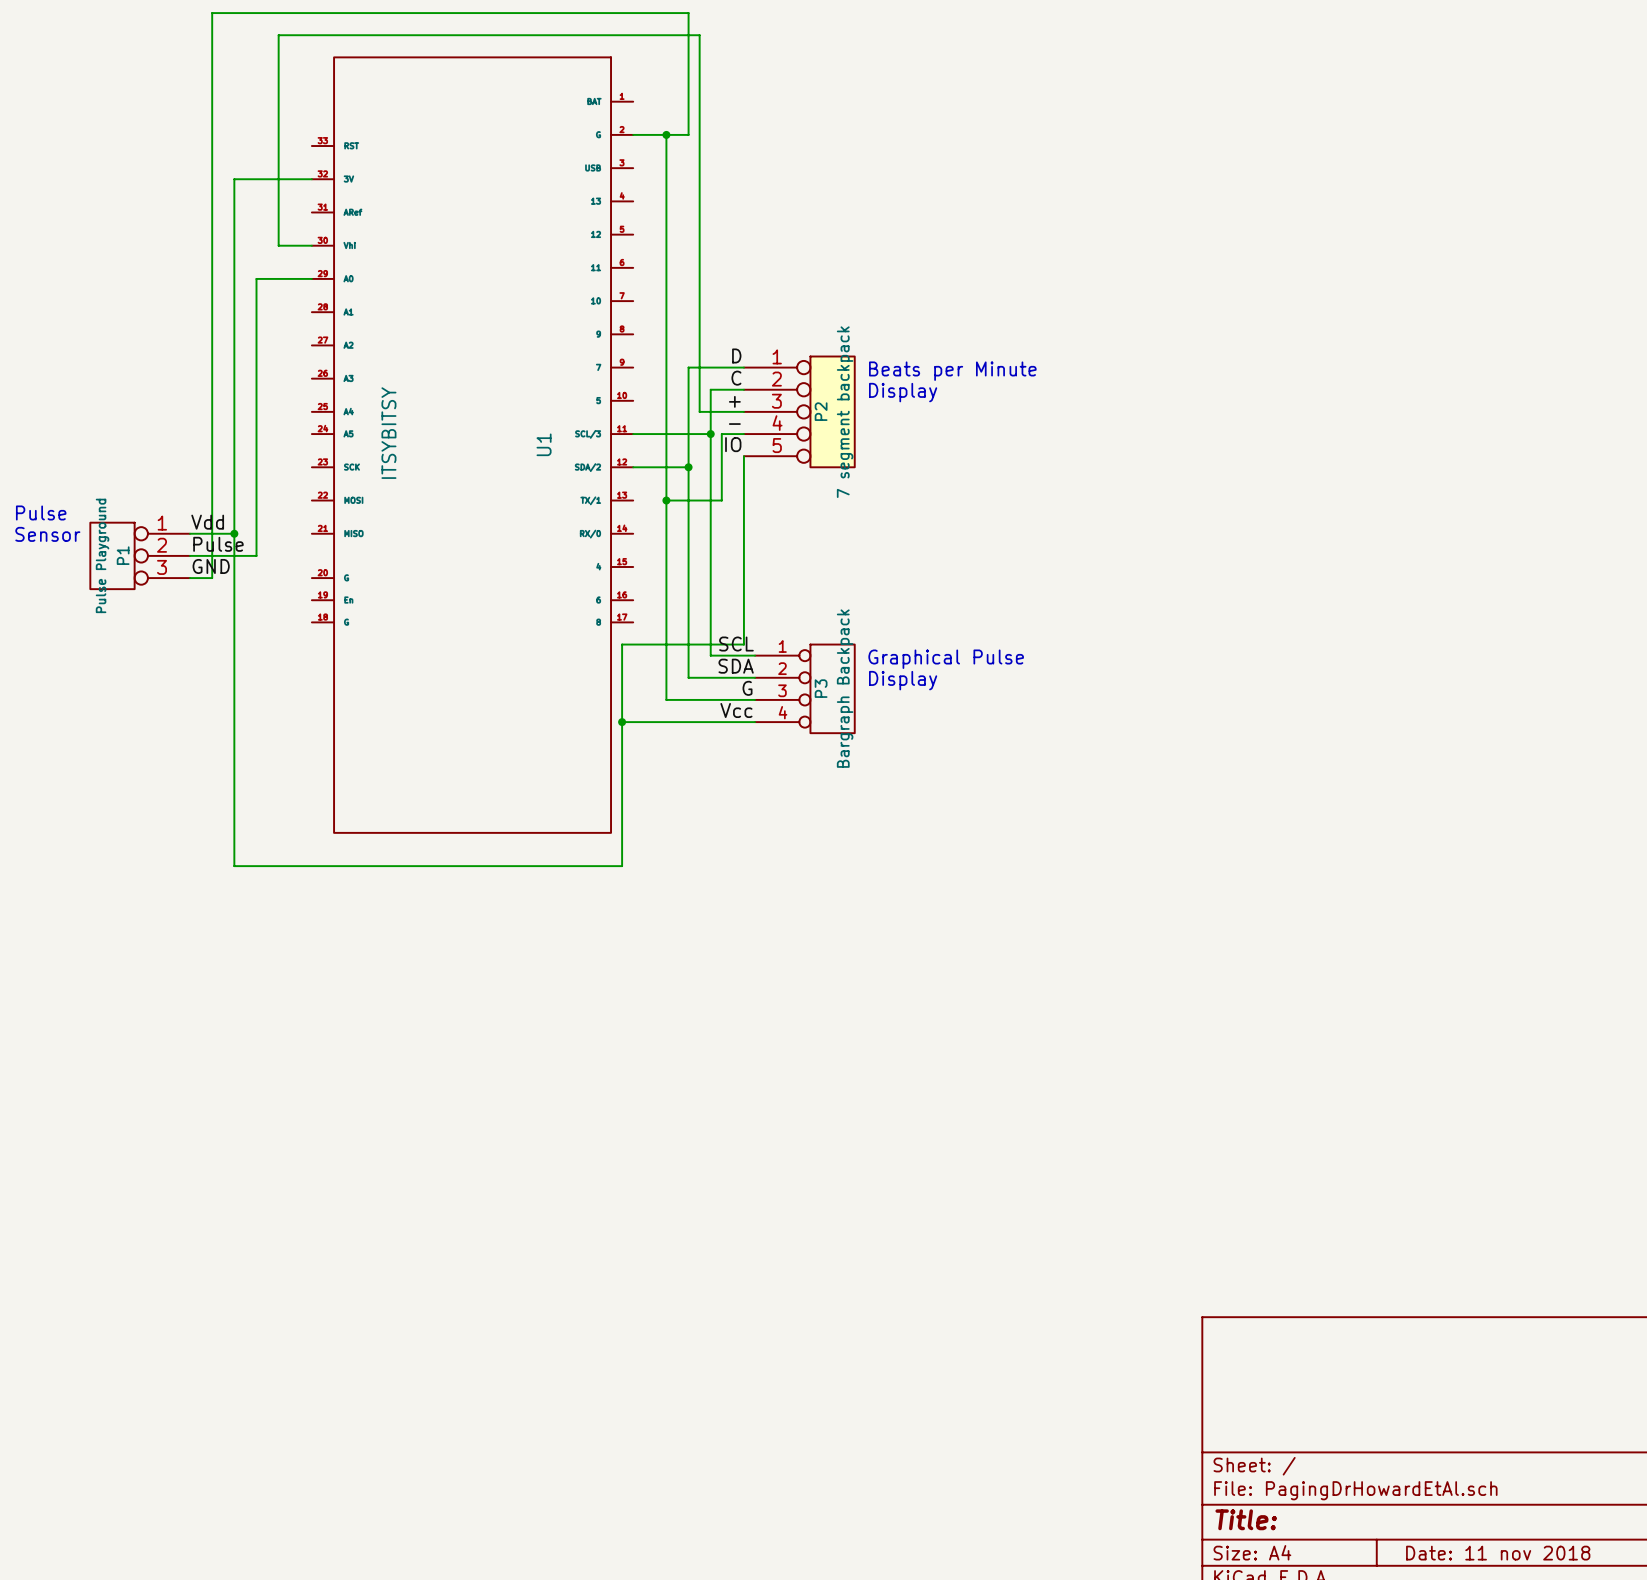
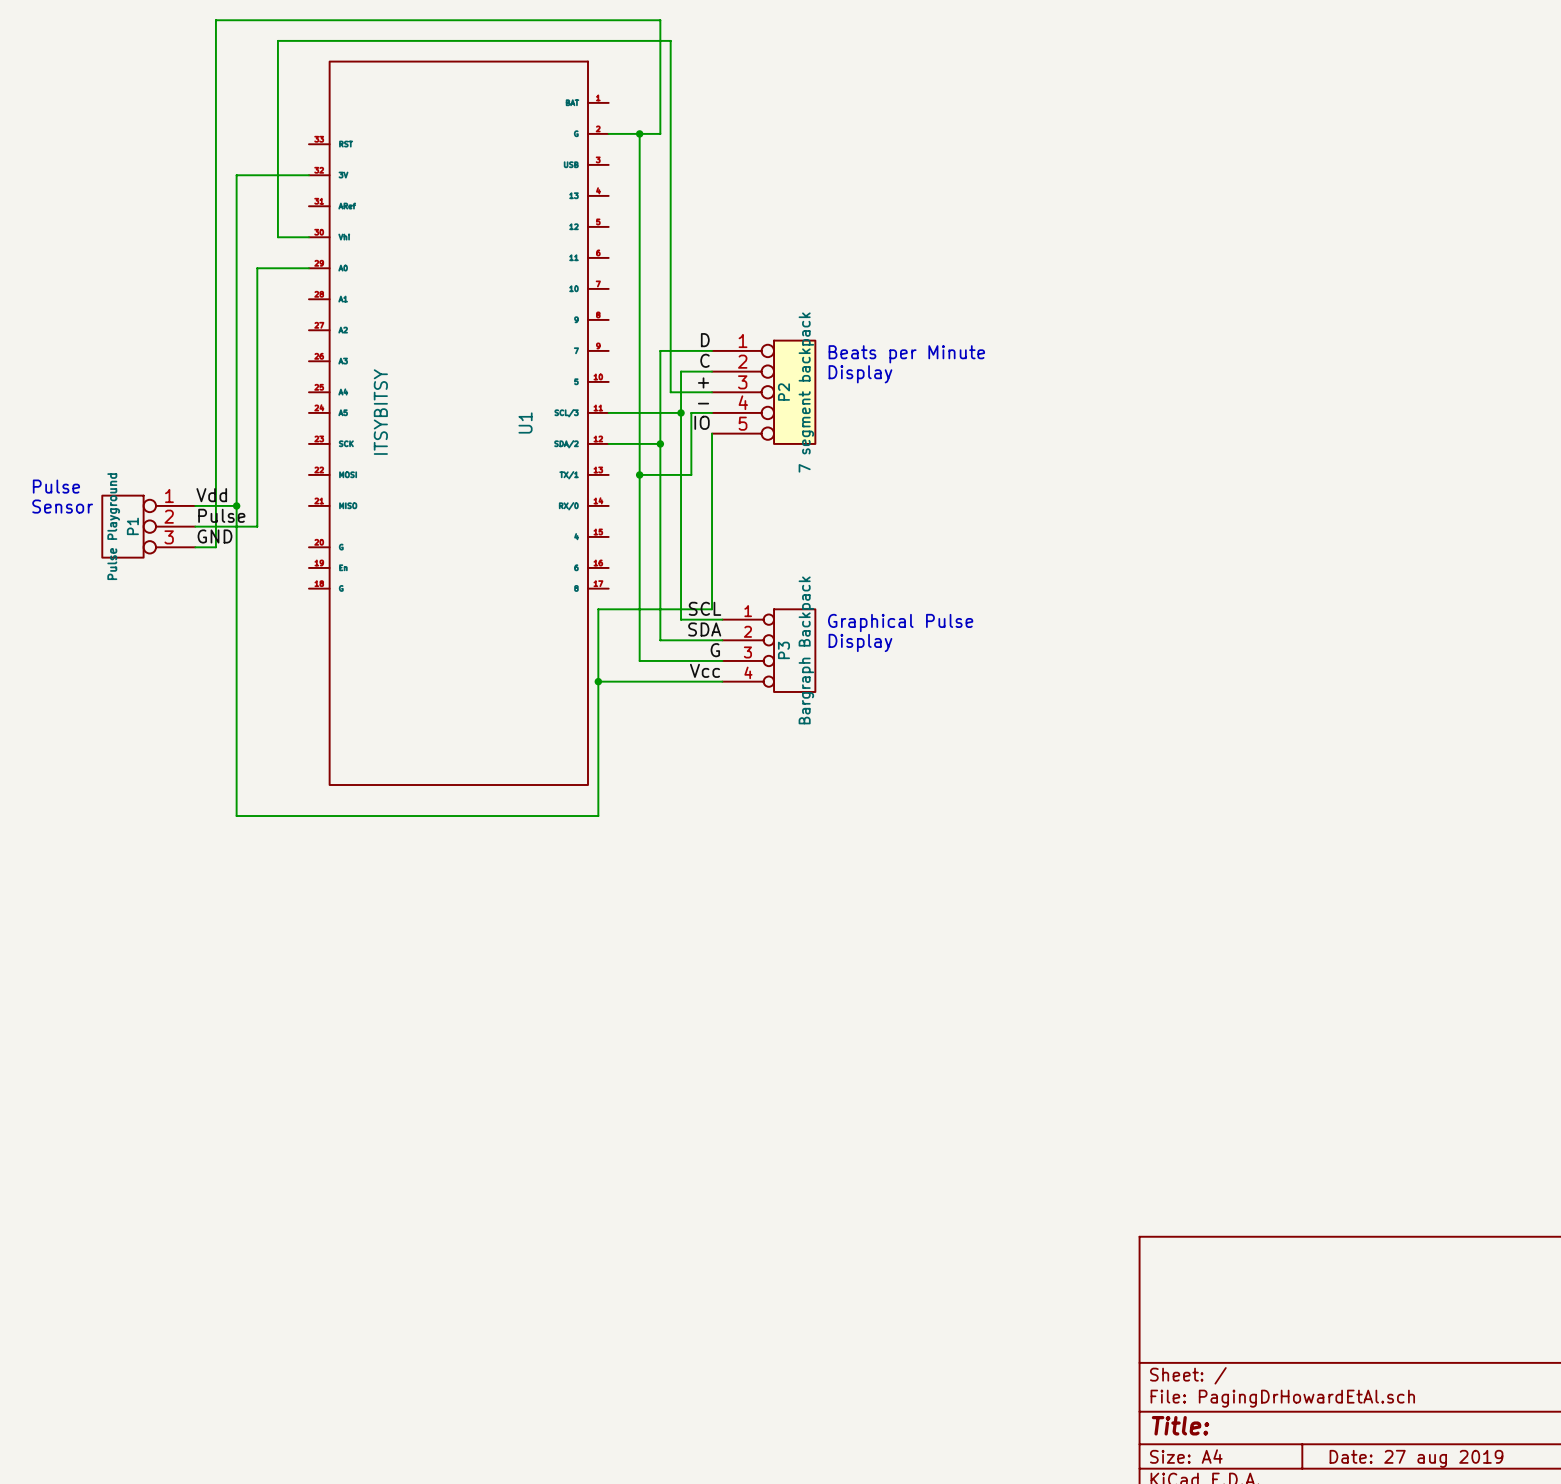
title block: Date: 11 nov 2018 (1498, 1553) -> Date: 27 aug 2019 (1416, 1458)

